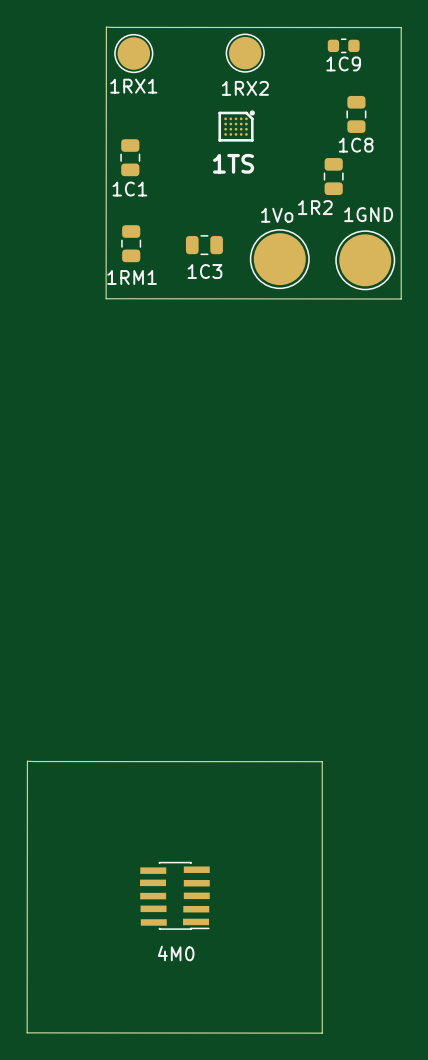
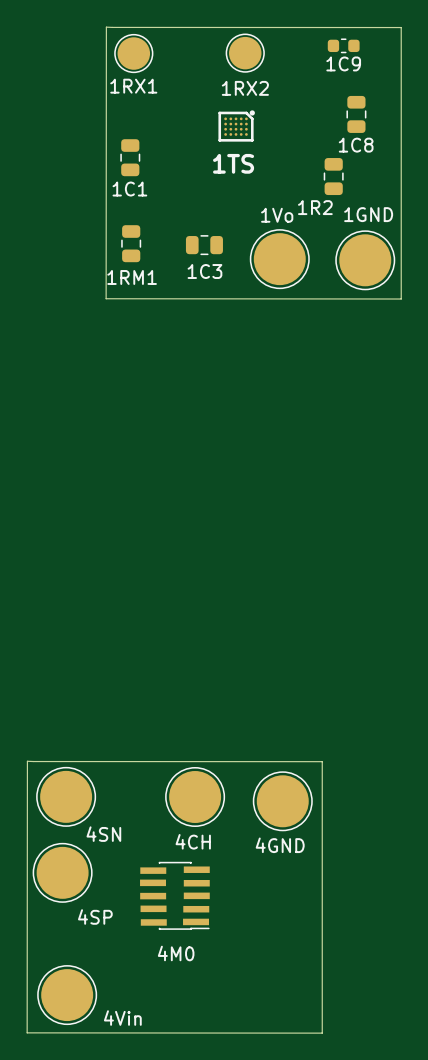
4SN: none -> (66, 796)
4CH: none -> (195, 796)
4GND: none -> (282, 801)
4SP: none -> (62, 872)
4Vin: none -> (67, 995)

